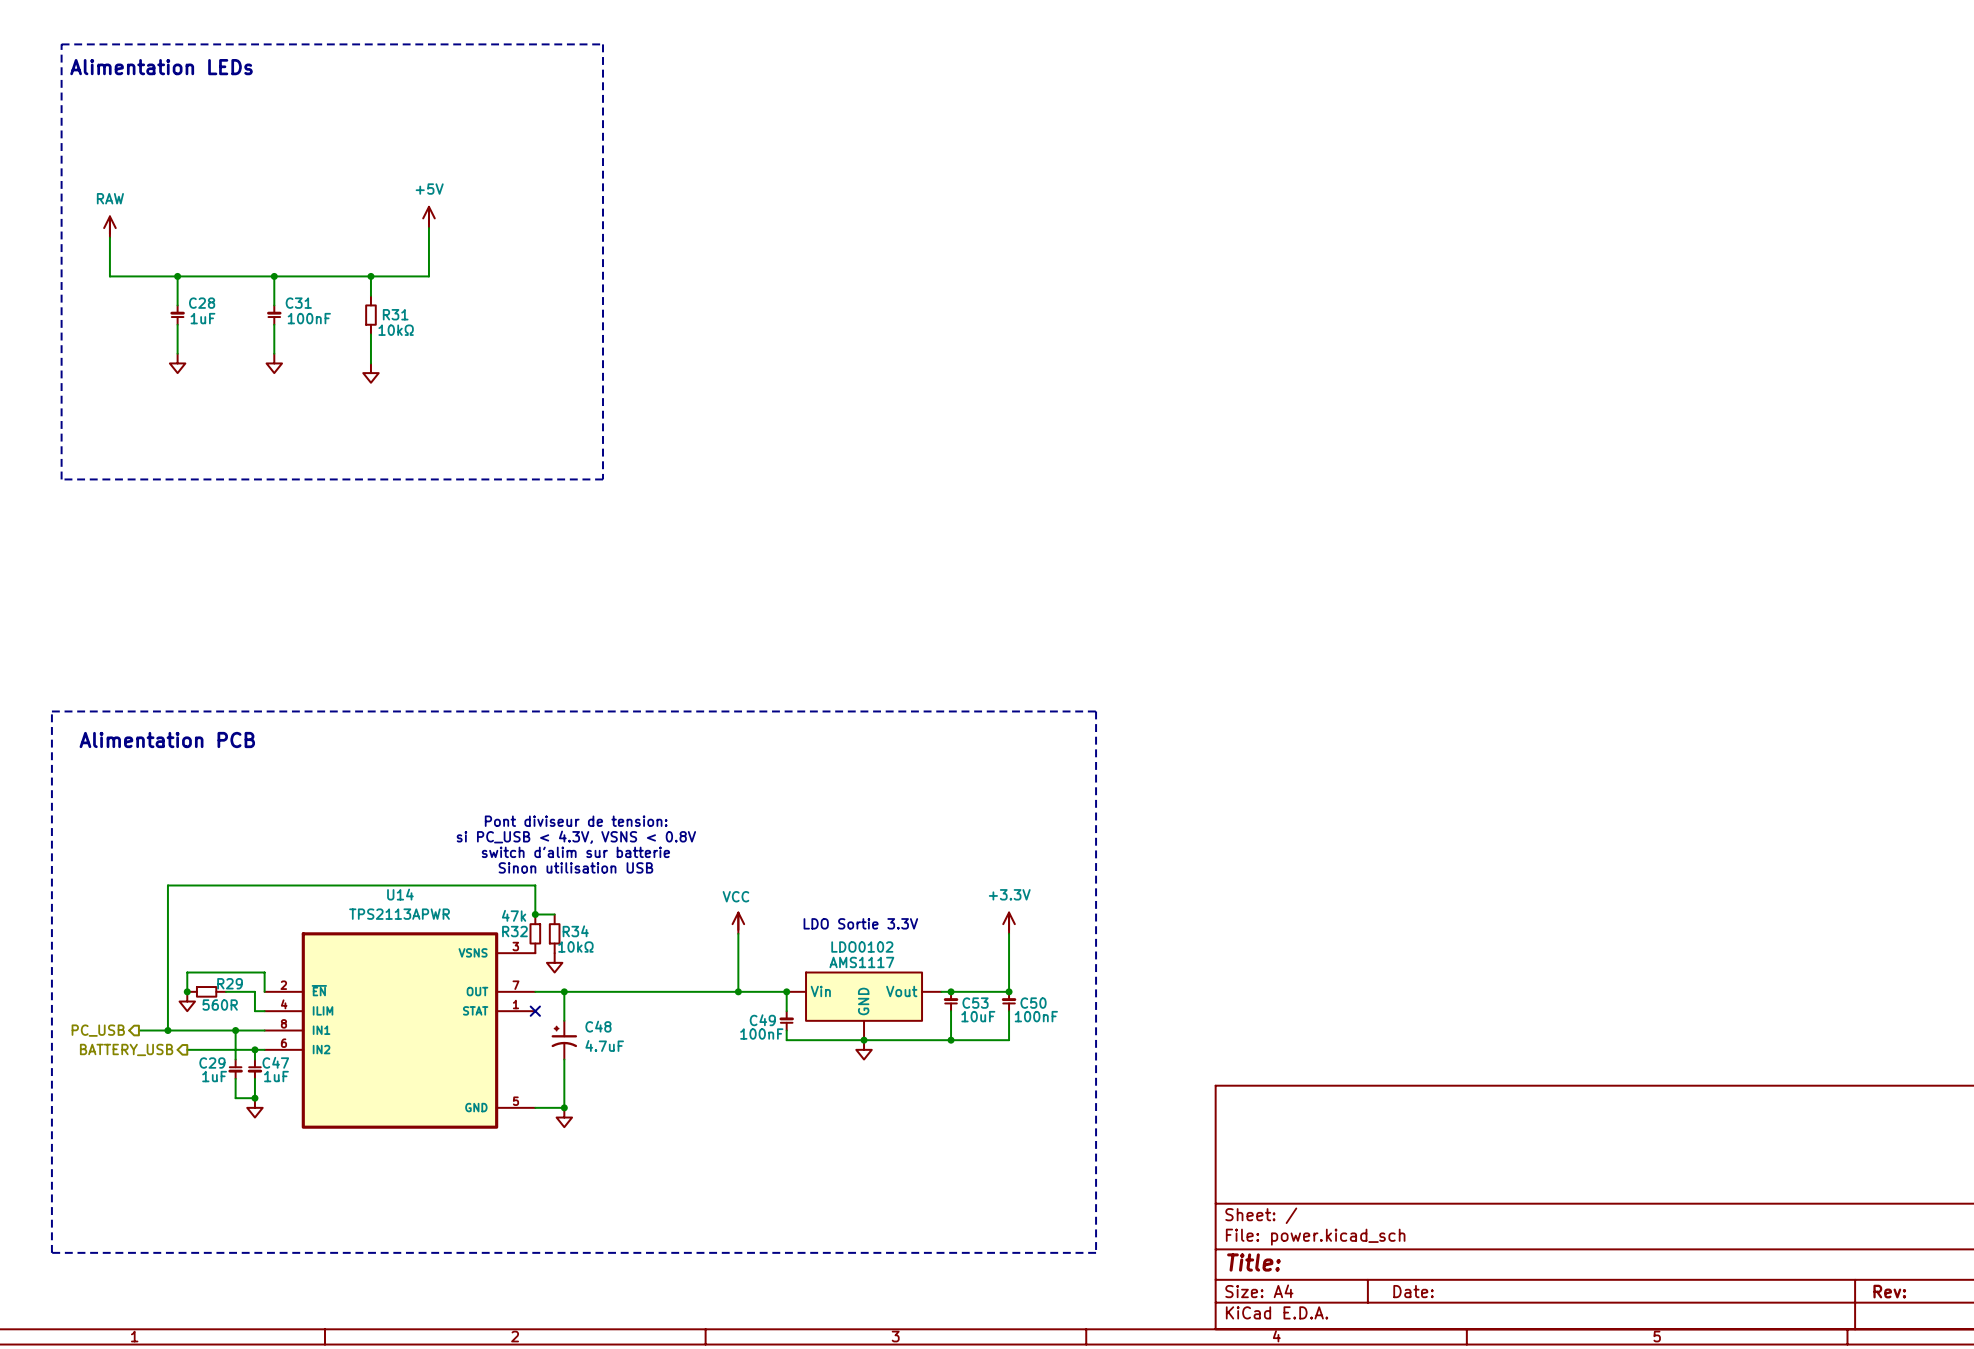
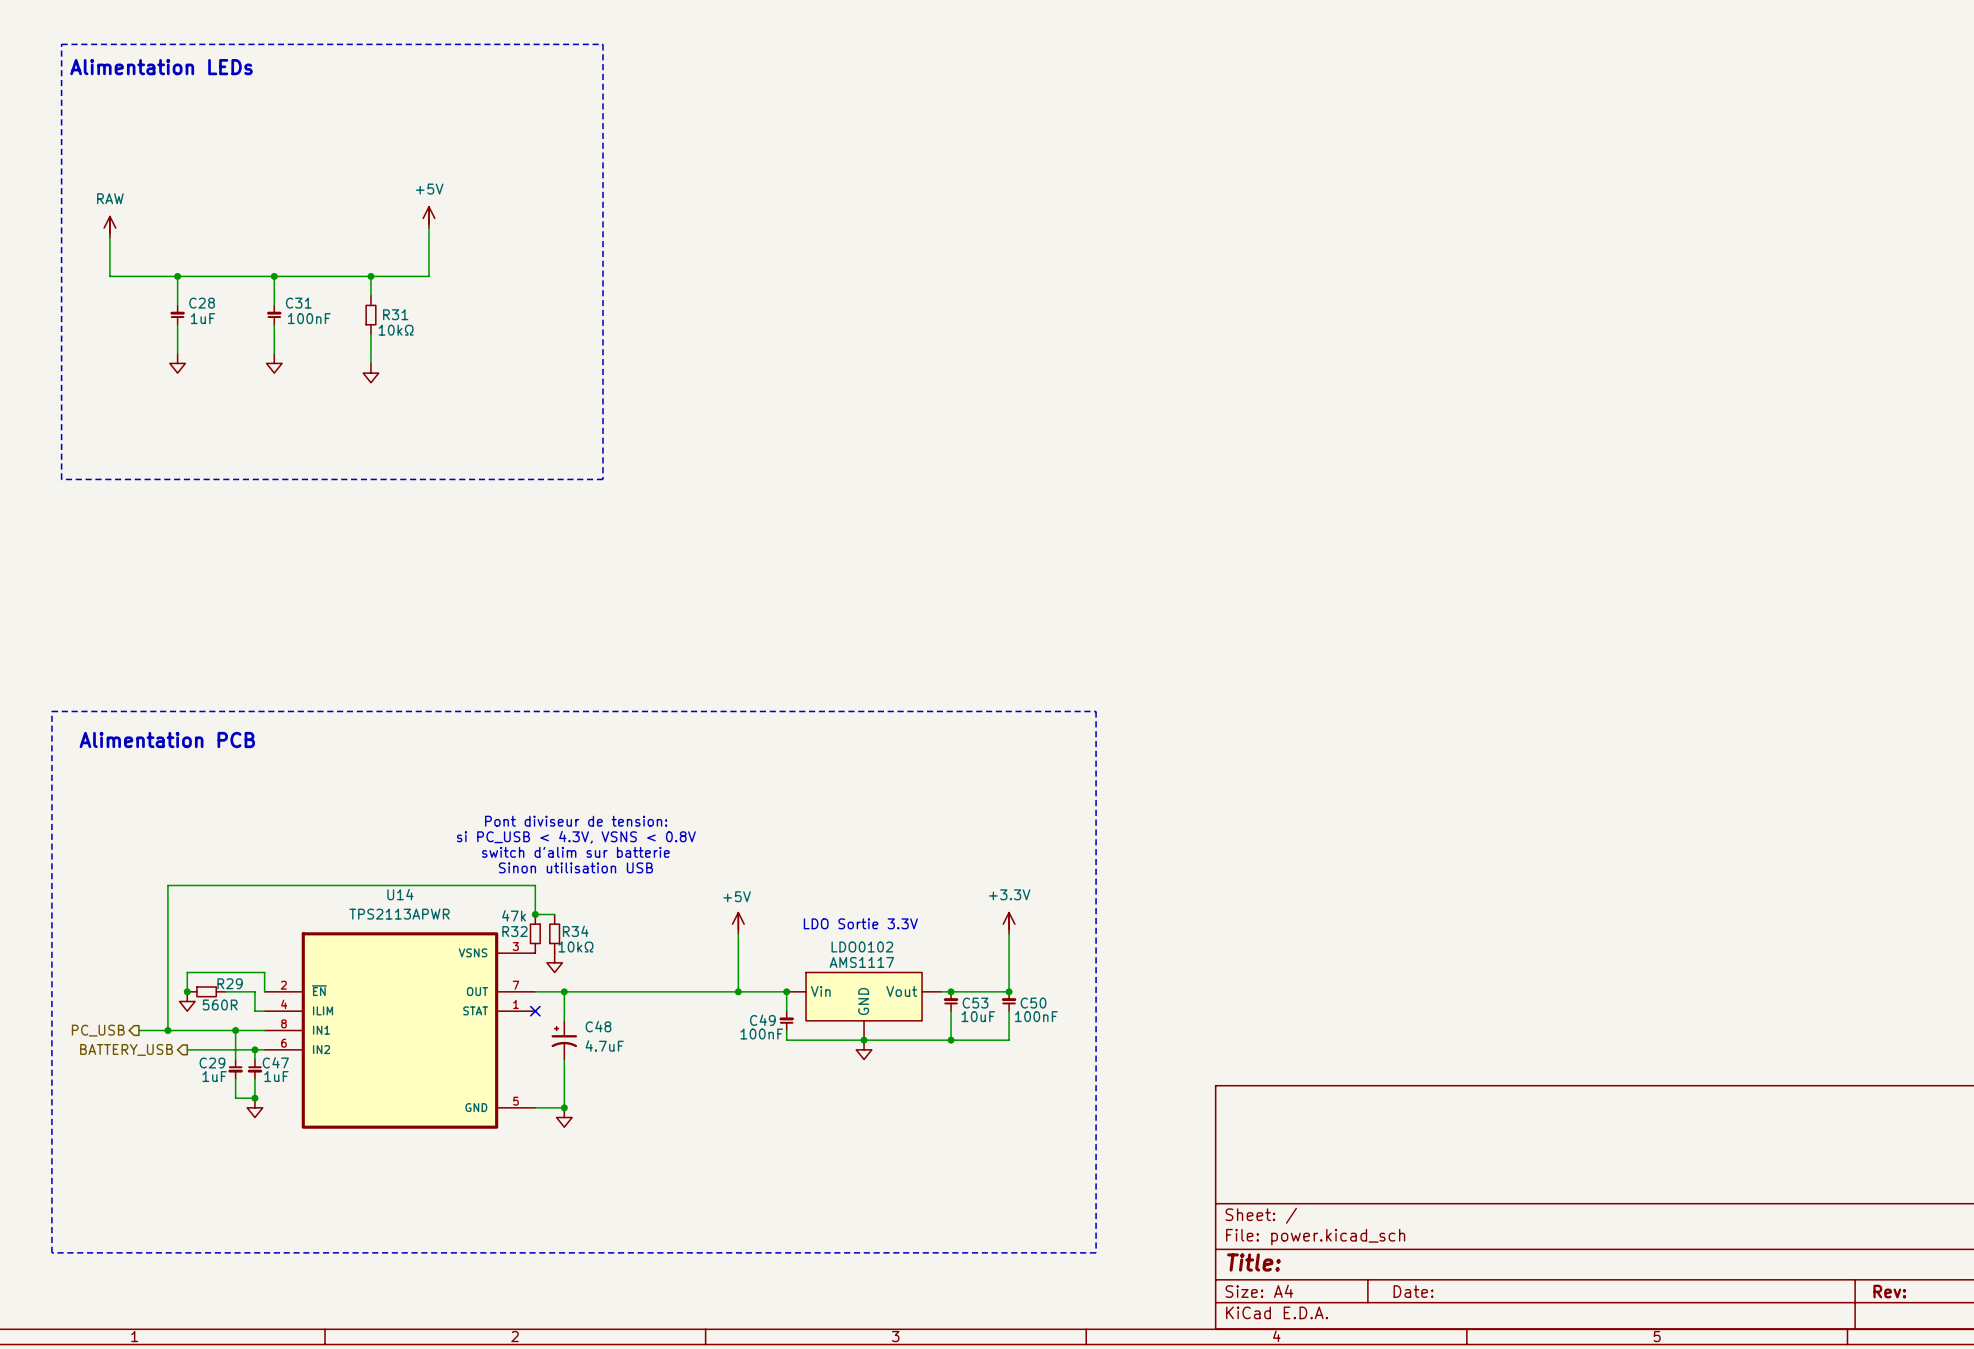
power symbol: VCC (738, 923) -> +5V (738, 923)

